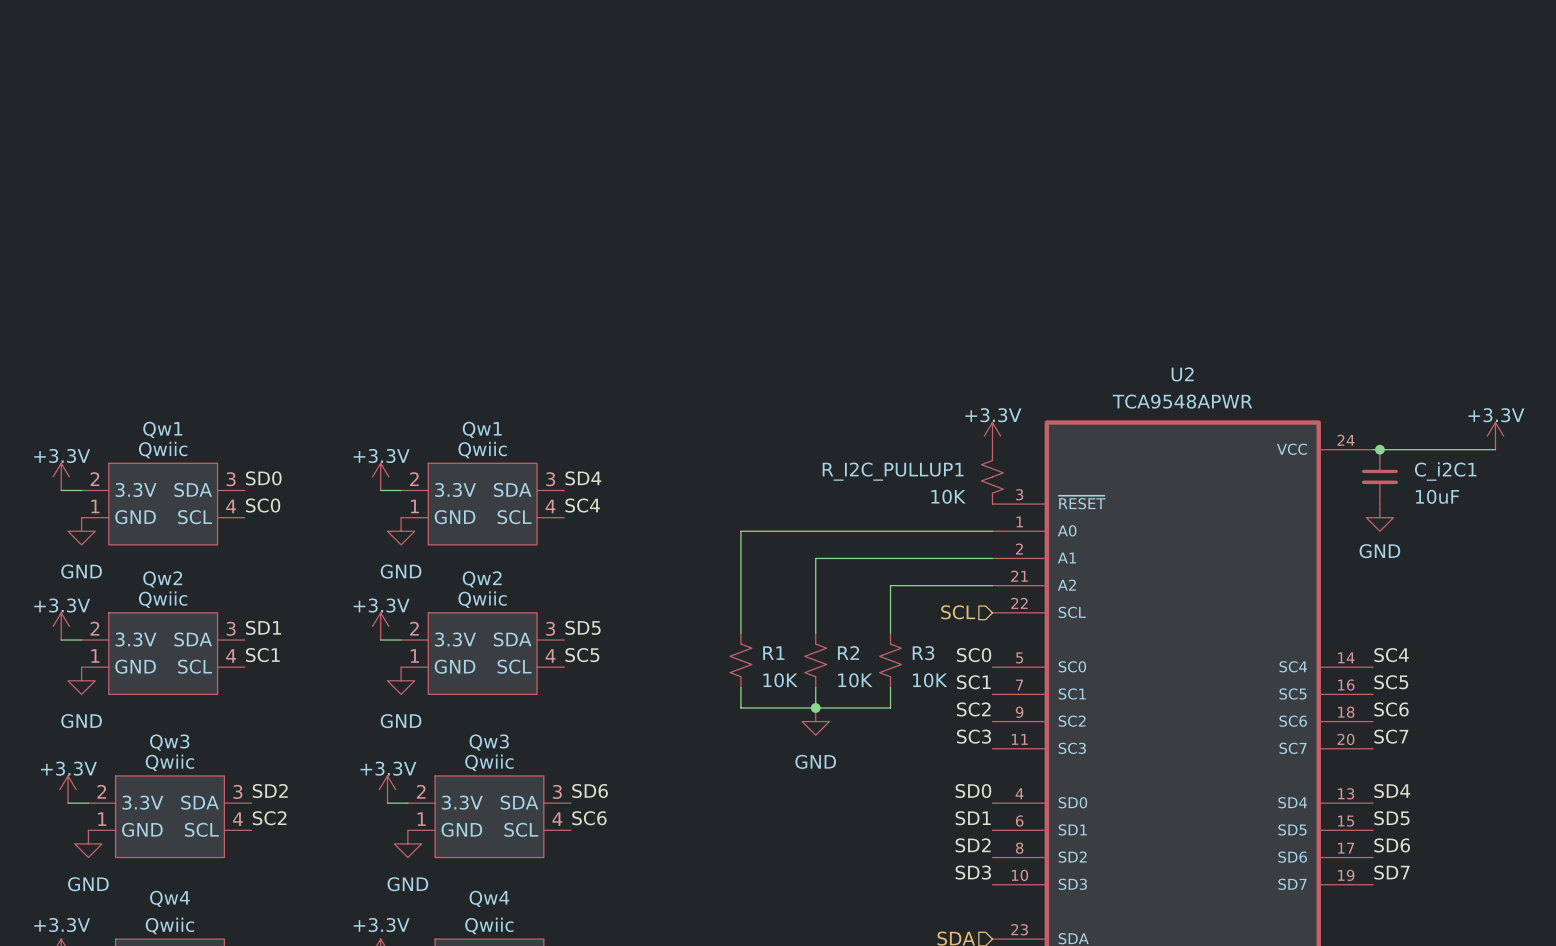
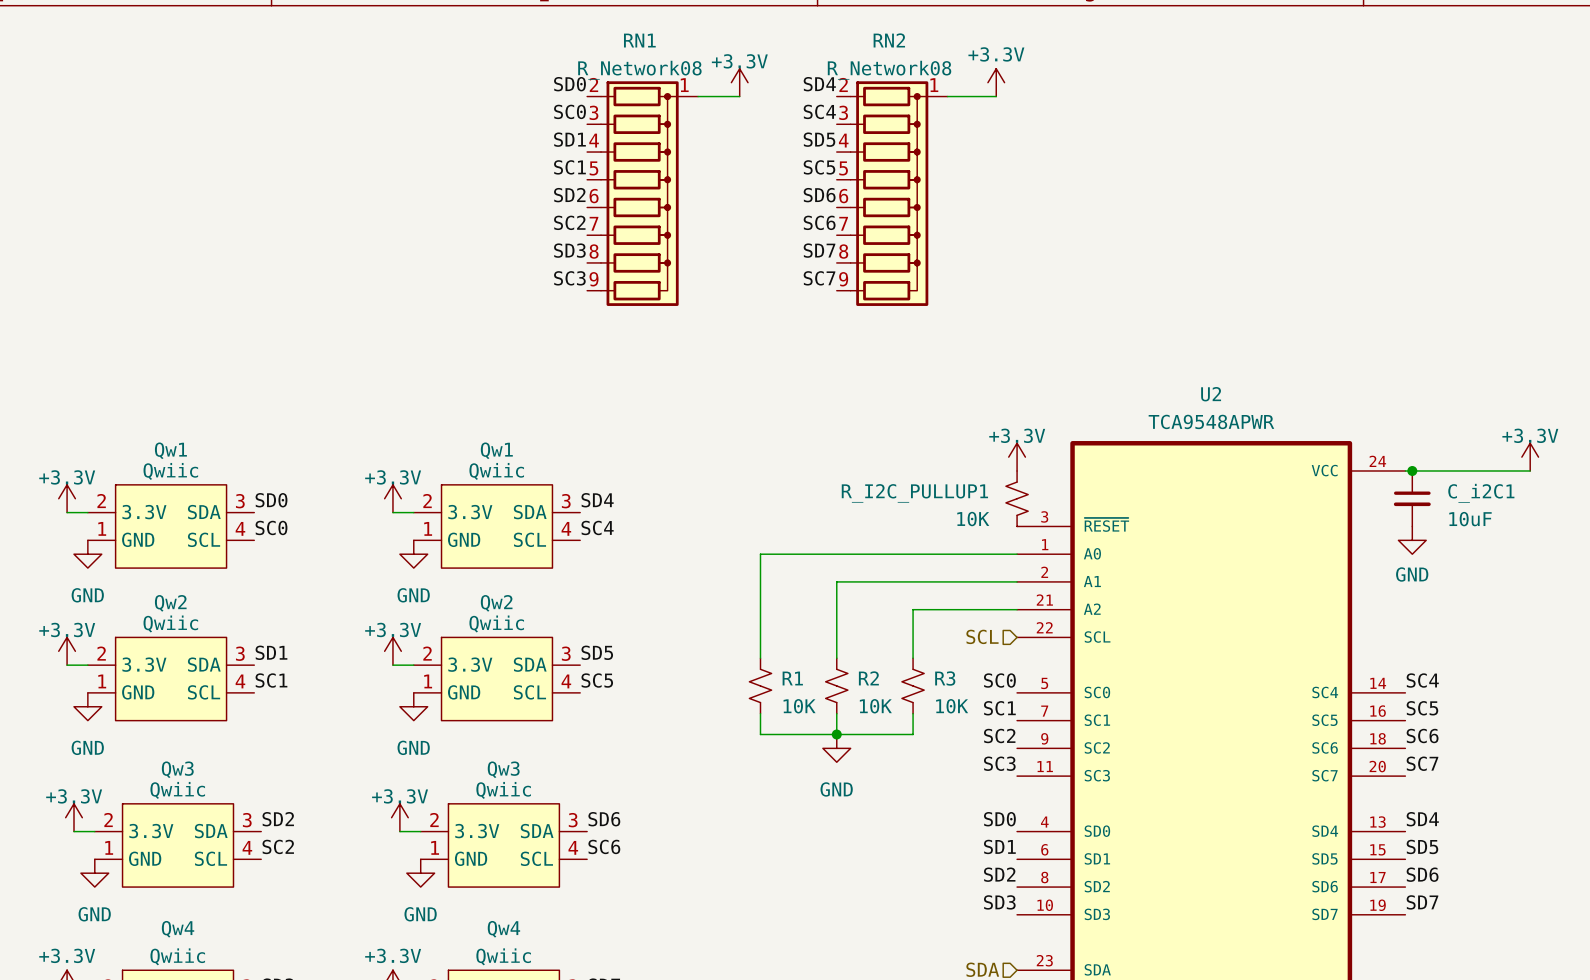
power symbol: none -> +3.3V (739, 82)
power symbol: none -> +3.3V (996, 82)
label: none -> SD0 (569, 84)
label: none -> SD4 (819, 84)
wire: none -> (698, 96) (739, 96)
wire: none -> (947, 96) (996, 96)
label: none -> SC0 (569, 111)
label: none -> SC4 (819, 111)
label: none -> SD1 (569, 139)
label: none -> SD5 (819, 139)
label: none -> SC1 (569, 167)
label: none -> SC5 (819, 167)
RN1: none -> R_Network08 (642, 193)
RN2: none -> R_Network08 (892, 193)
label: none -> SD2 (569, 195)
label: none -> SD6 (819, 195)
label: none -> SC2 (569, 222)
label: none -> SC6 (819, 222)
label: none -> SD3 (569, 250)
label: none -> SD7 (819, 250)
label: none -> SC3 (569, 278)
label: none -> SC7 (819, 278)

